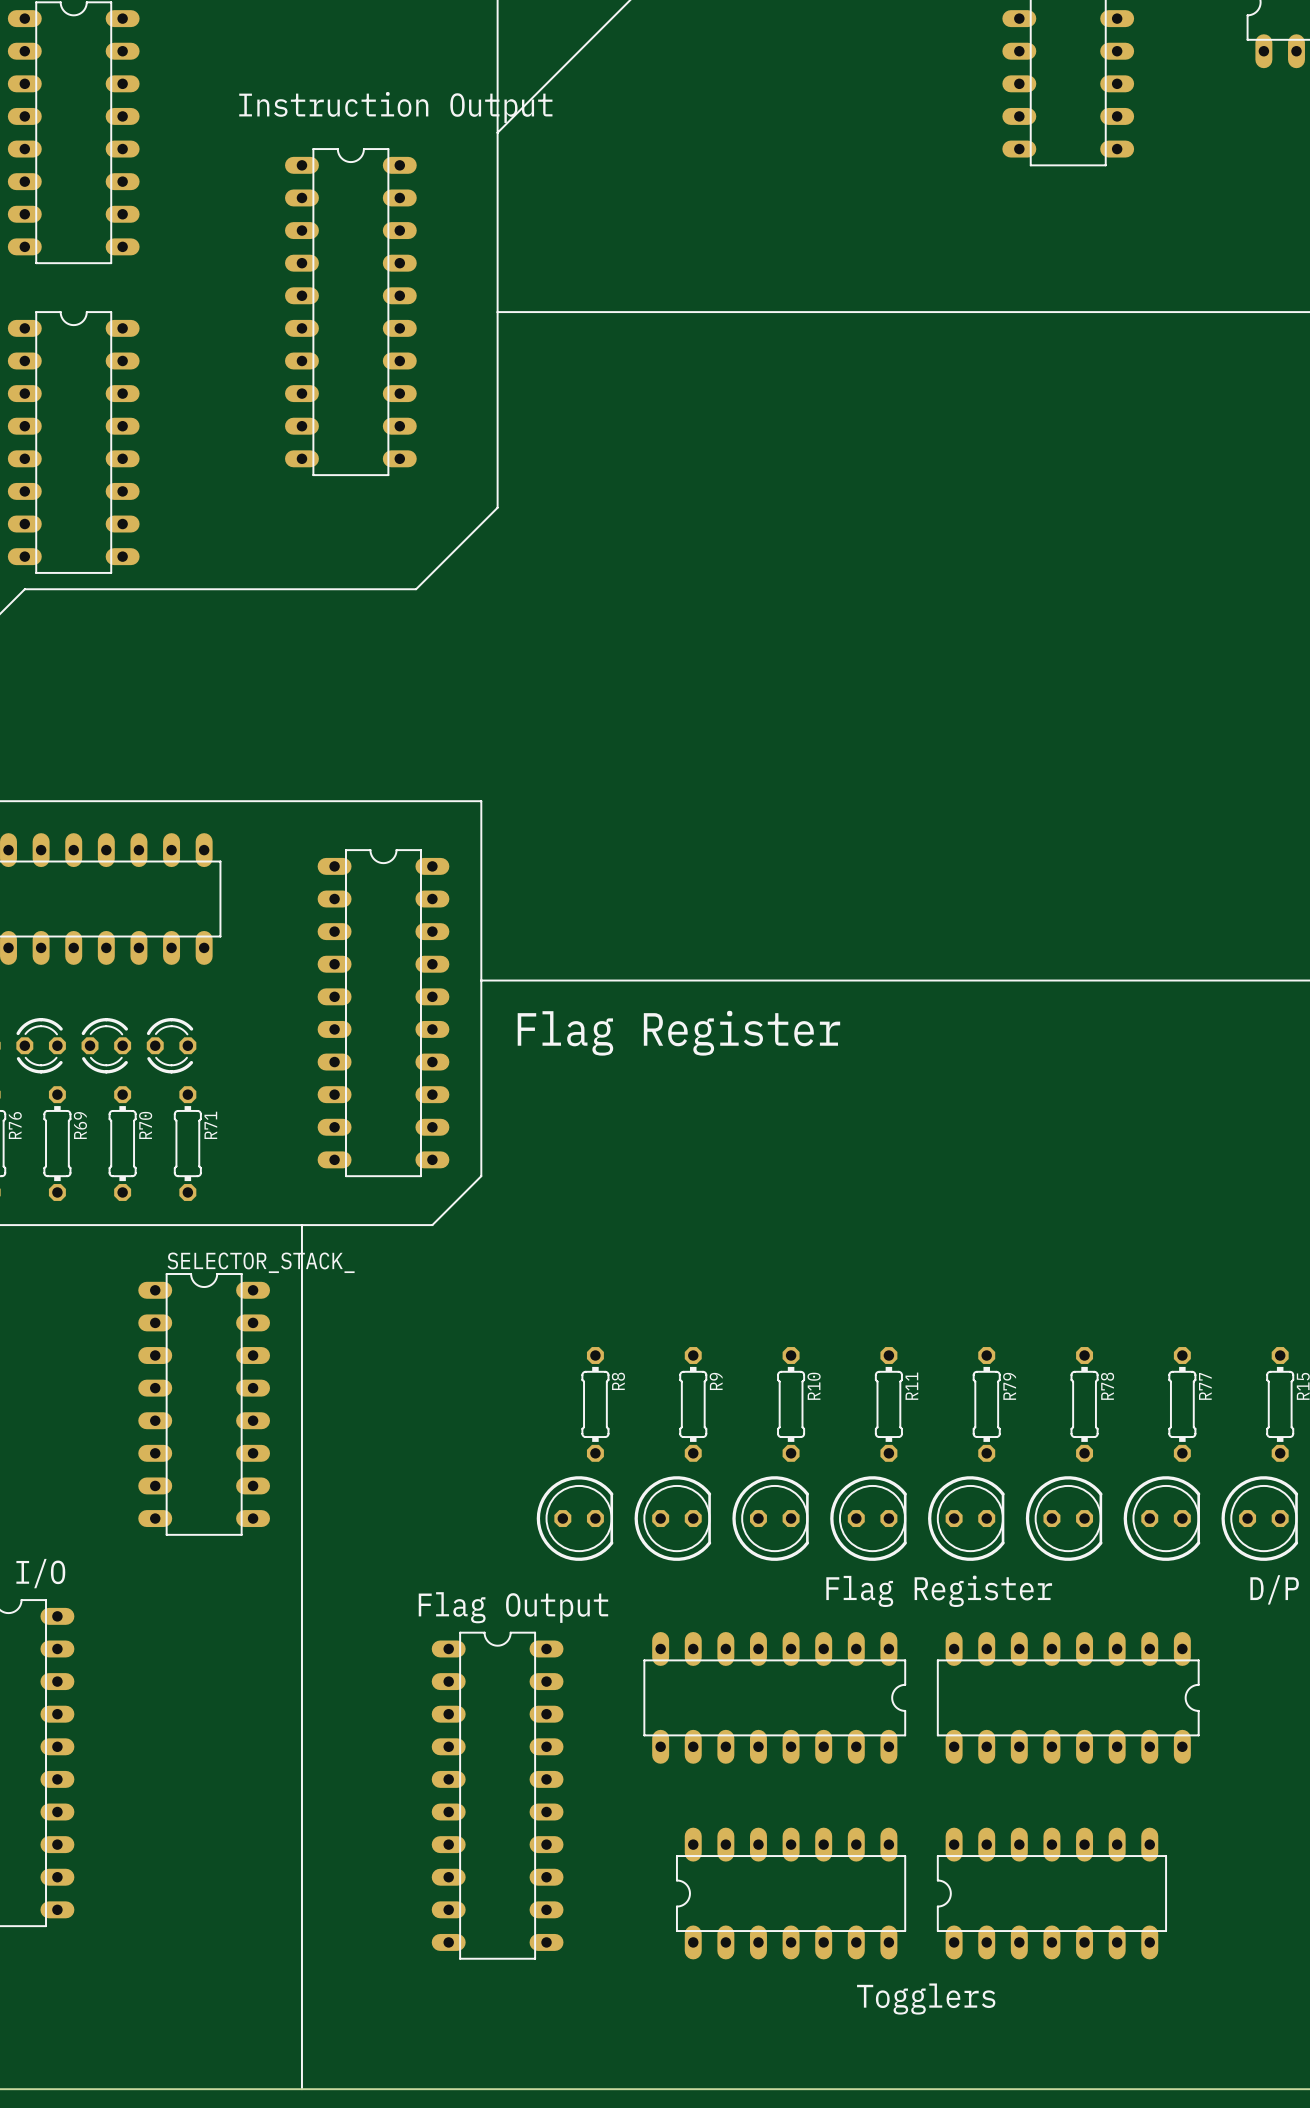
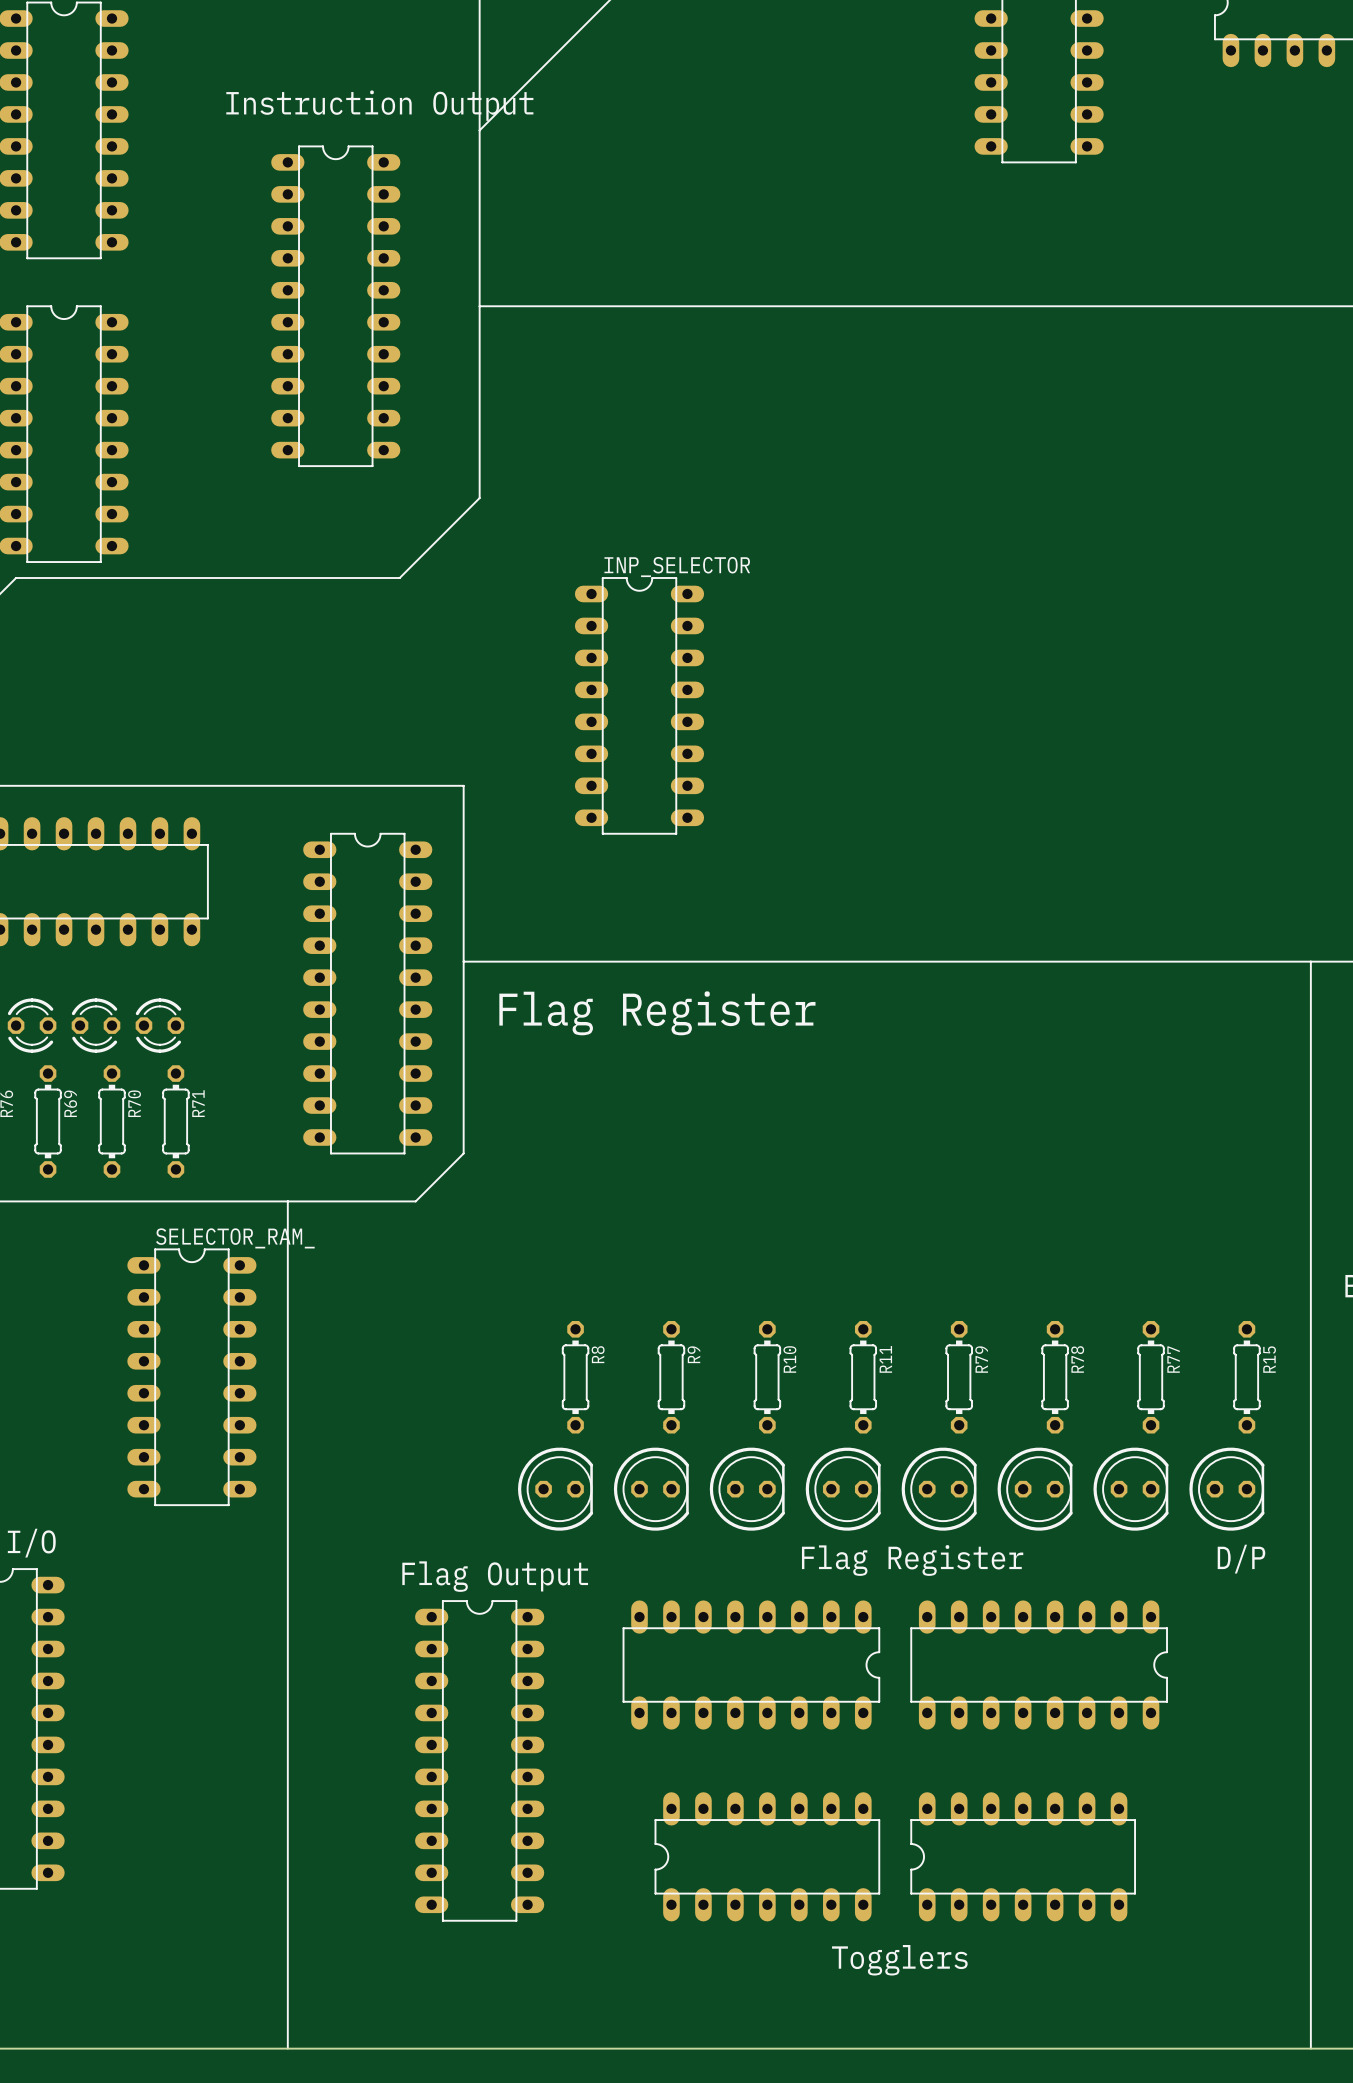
INP_SELECTOR: none -> (639, 705)
SELECTOR_STACK_ name: SELECTOR_STACK_ (261, 1262) -> SELECTOR_RAM_ (235, 1238)

